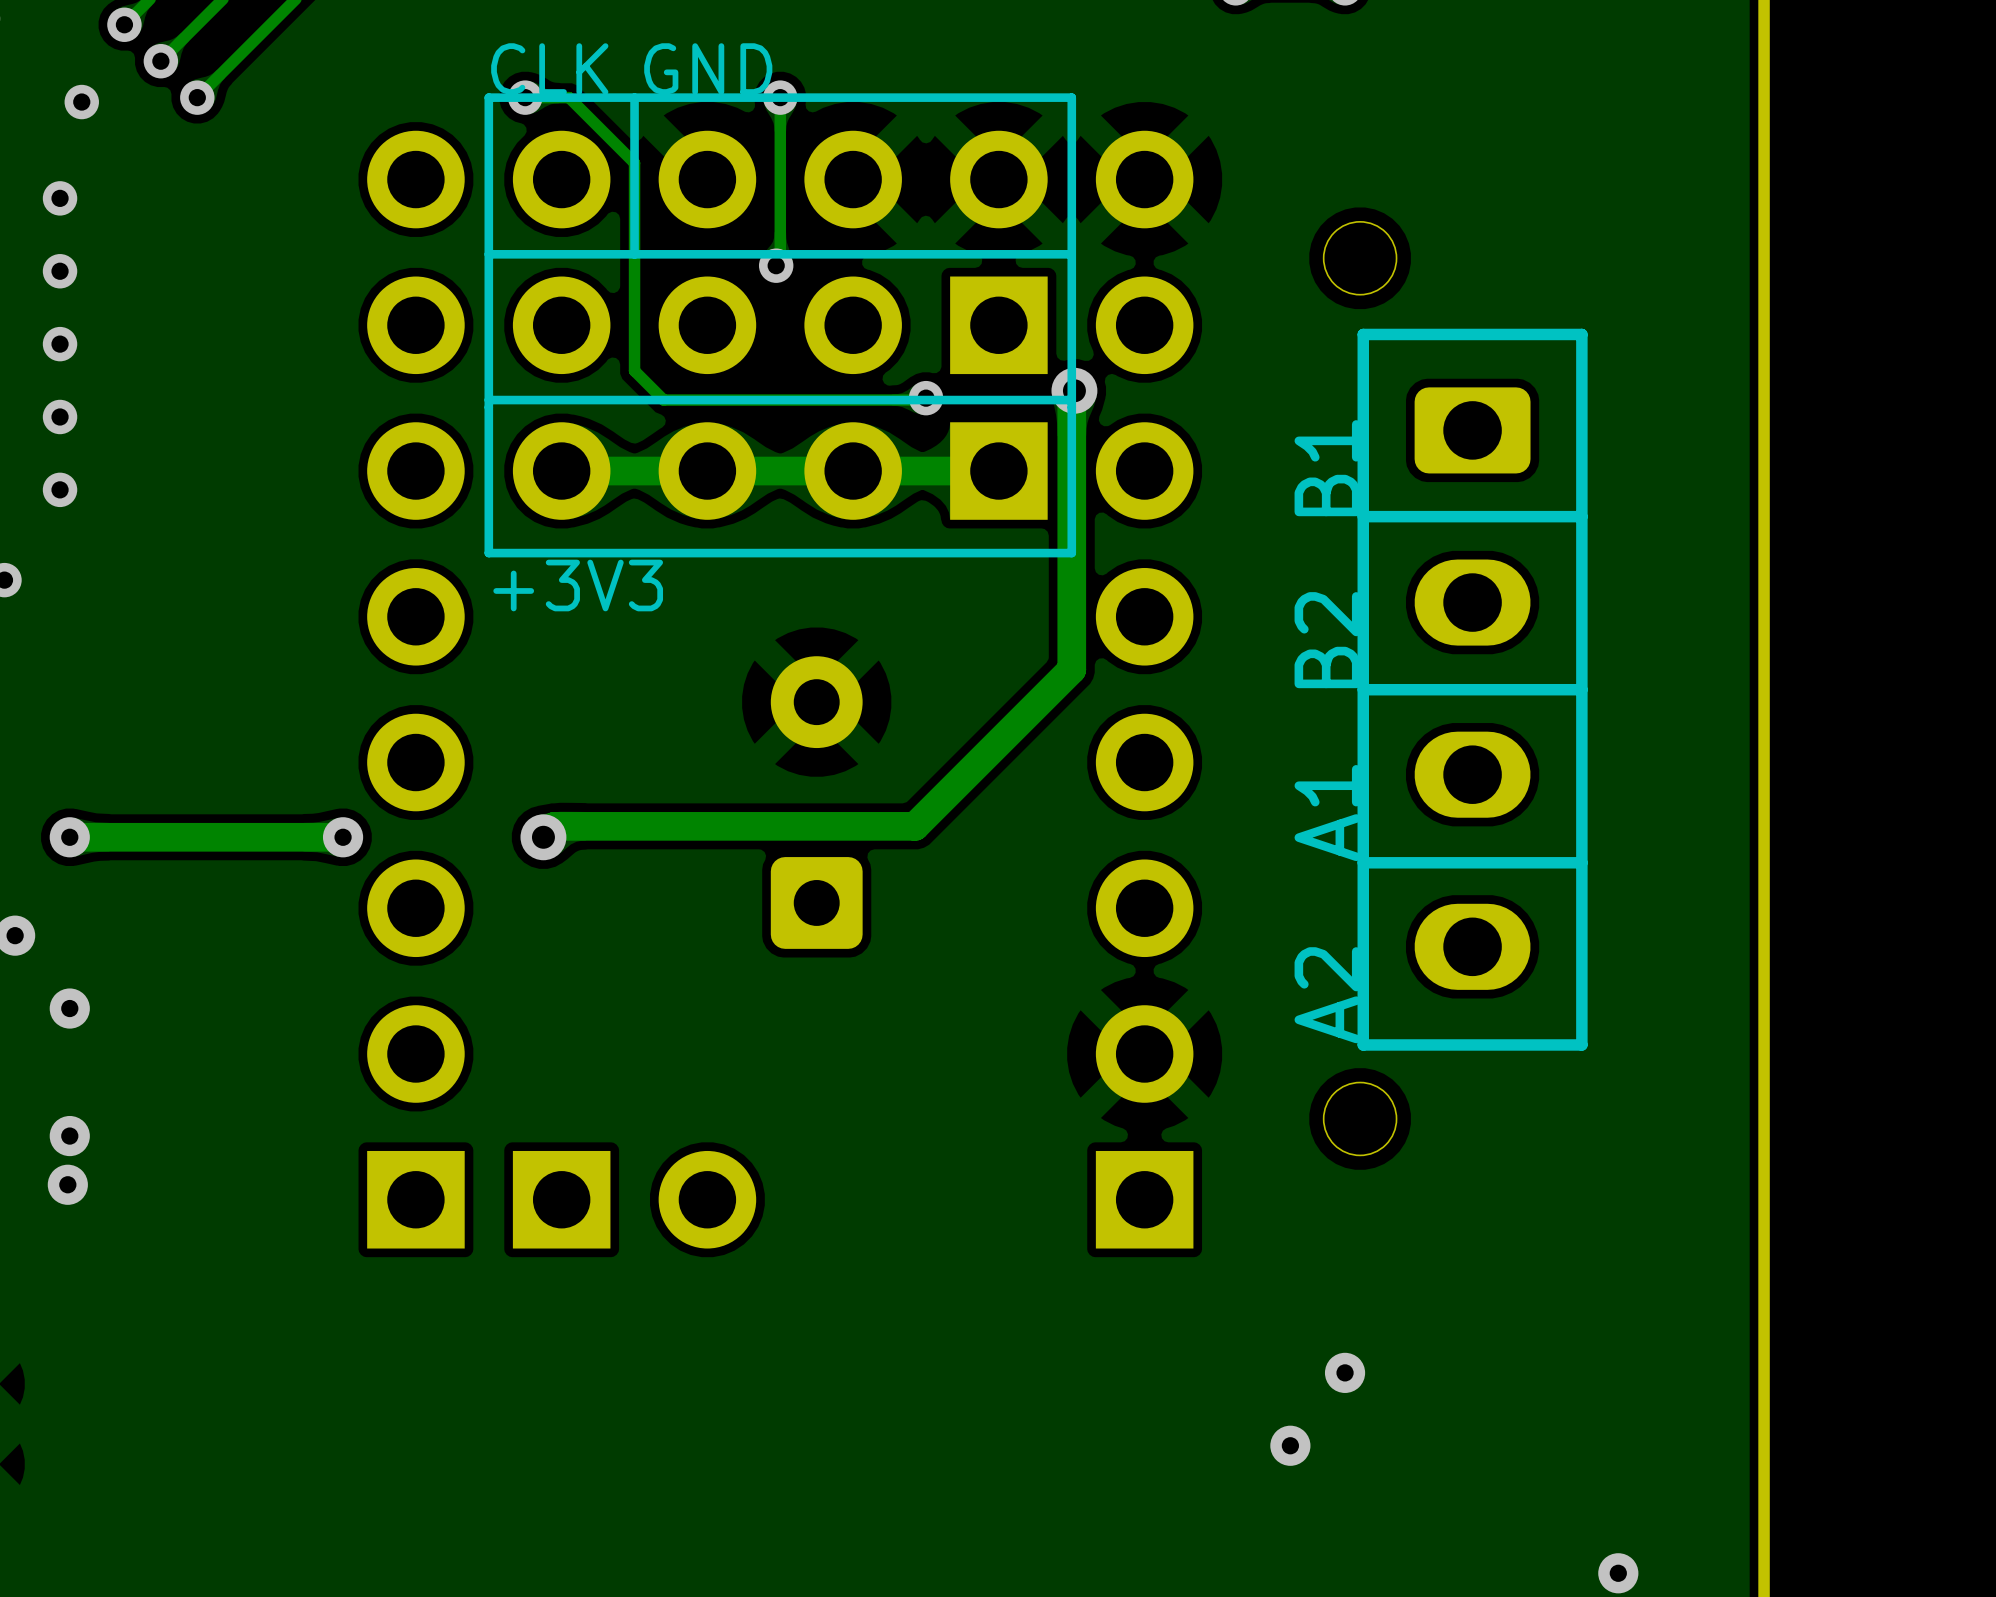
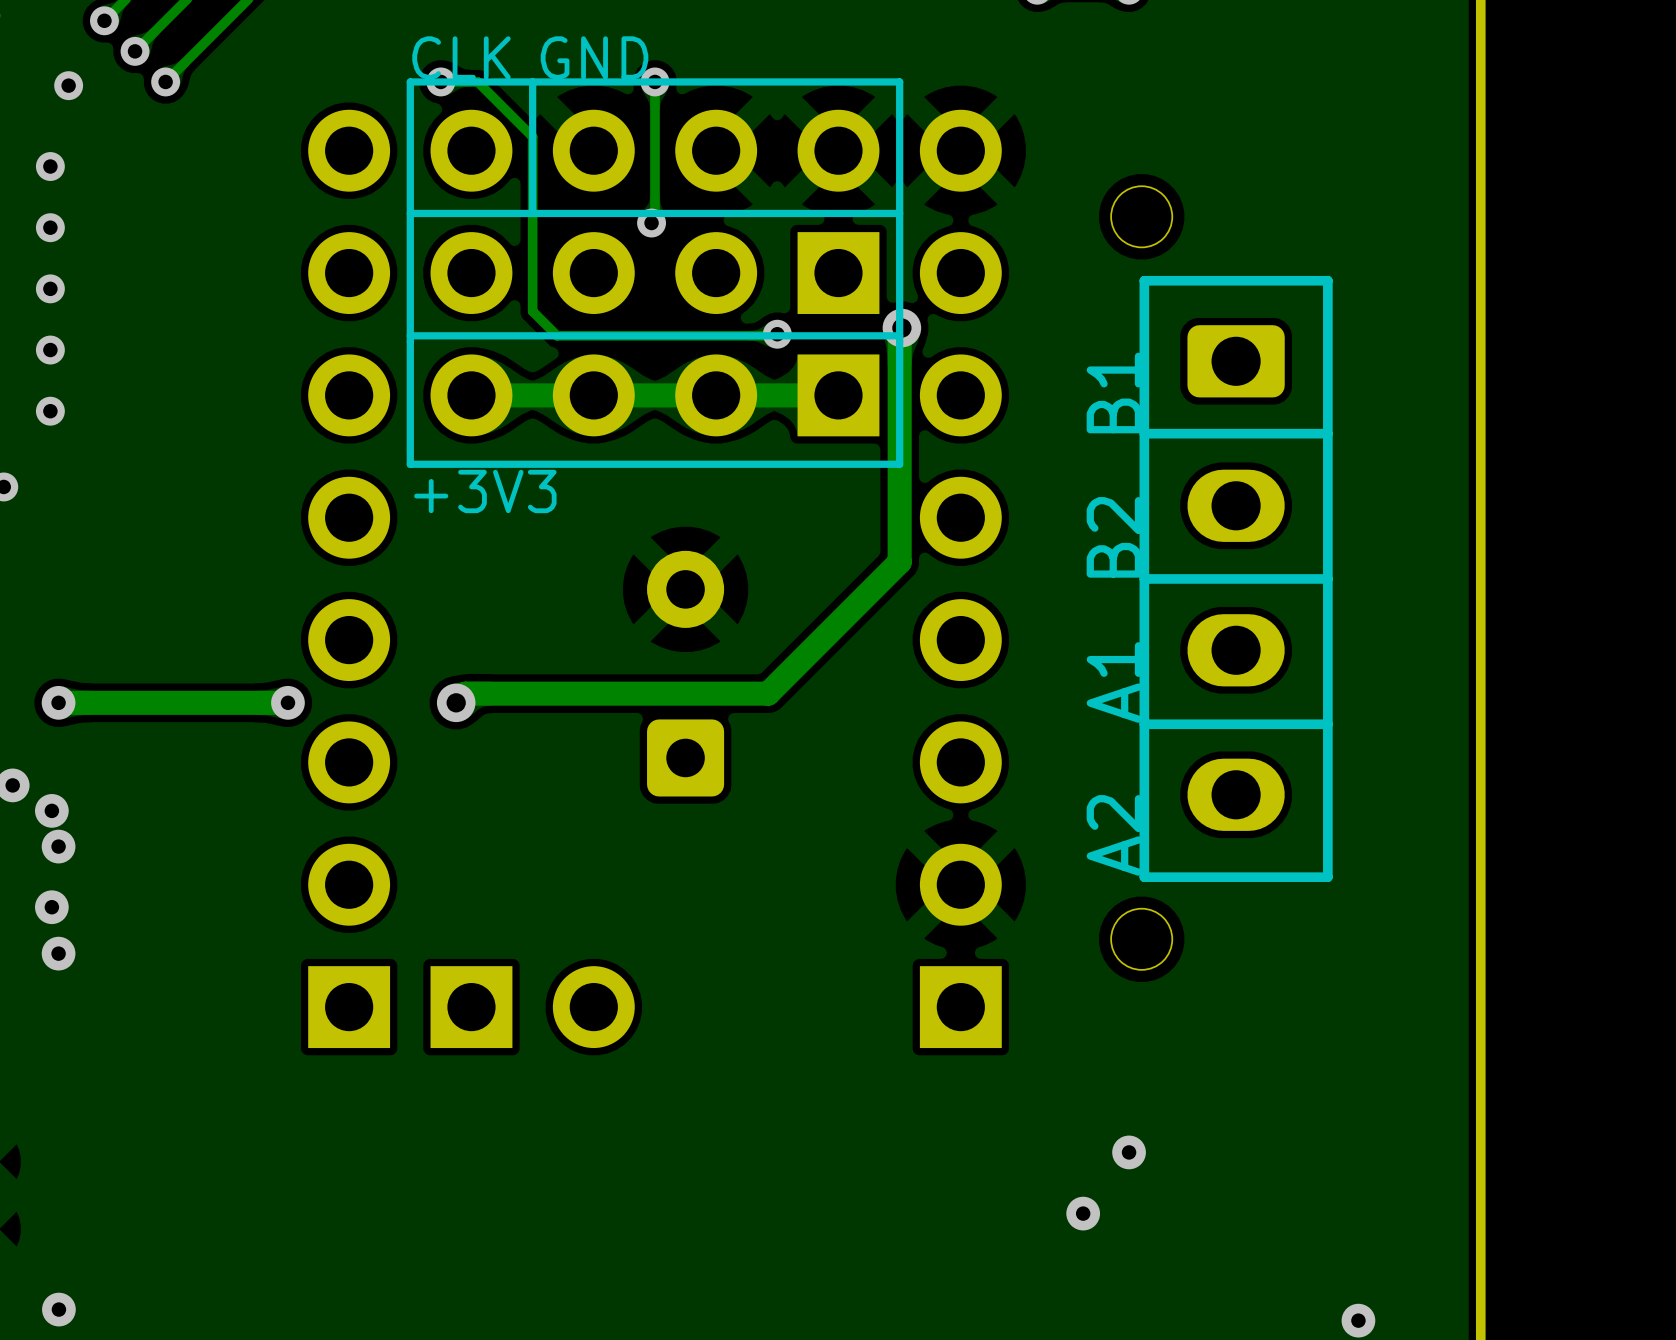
via: none -> (51, 810)
via position: (67, 1184) -> (51, 907)
via: none -> (58, 1309)

